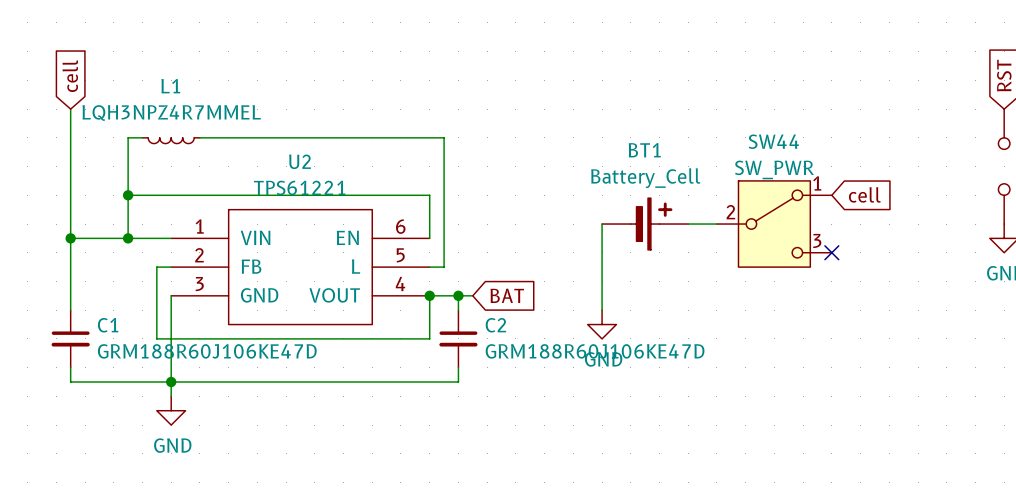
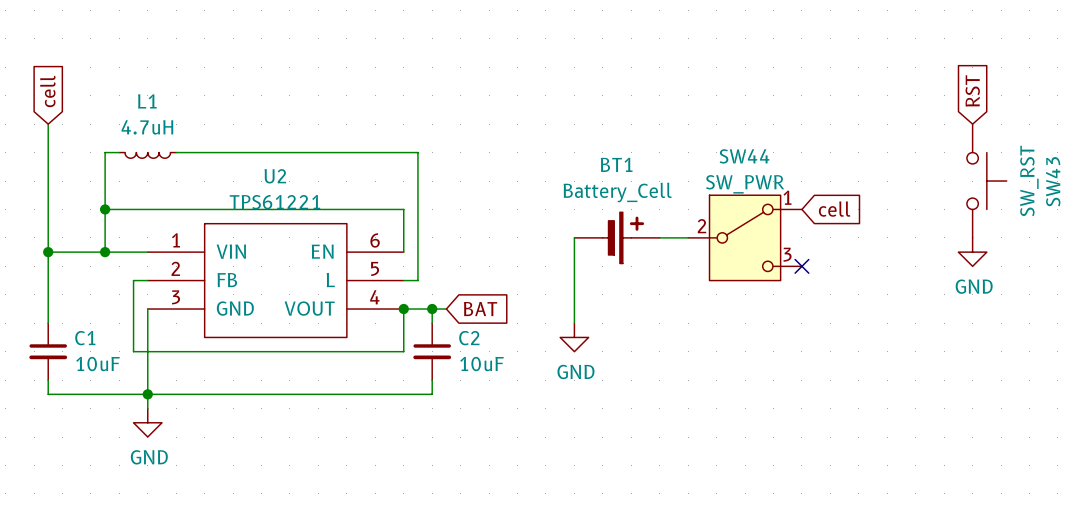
L1 value: LQH3NPZ4R7MMEL (171, 113) -> 4.7uH (147, 127)
C1 value: GRM188R60J106KE47D (207, 351) -> 10uF (97, 364)
C2 value: GRM188R60J106KE47D (595, 351) -> 10uF (481, 364)

